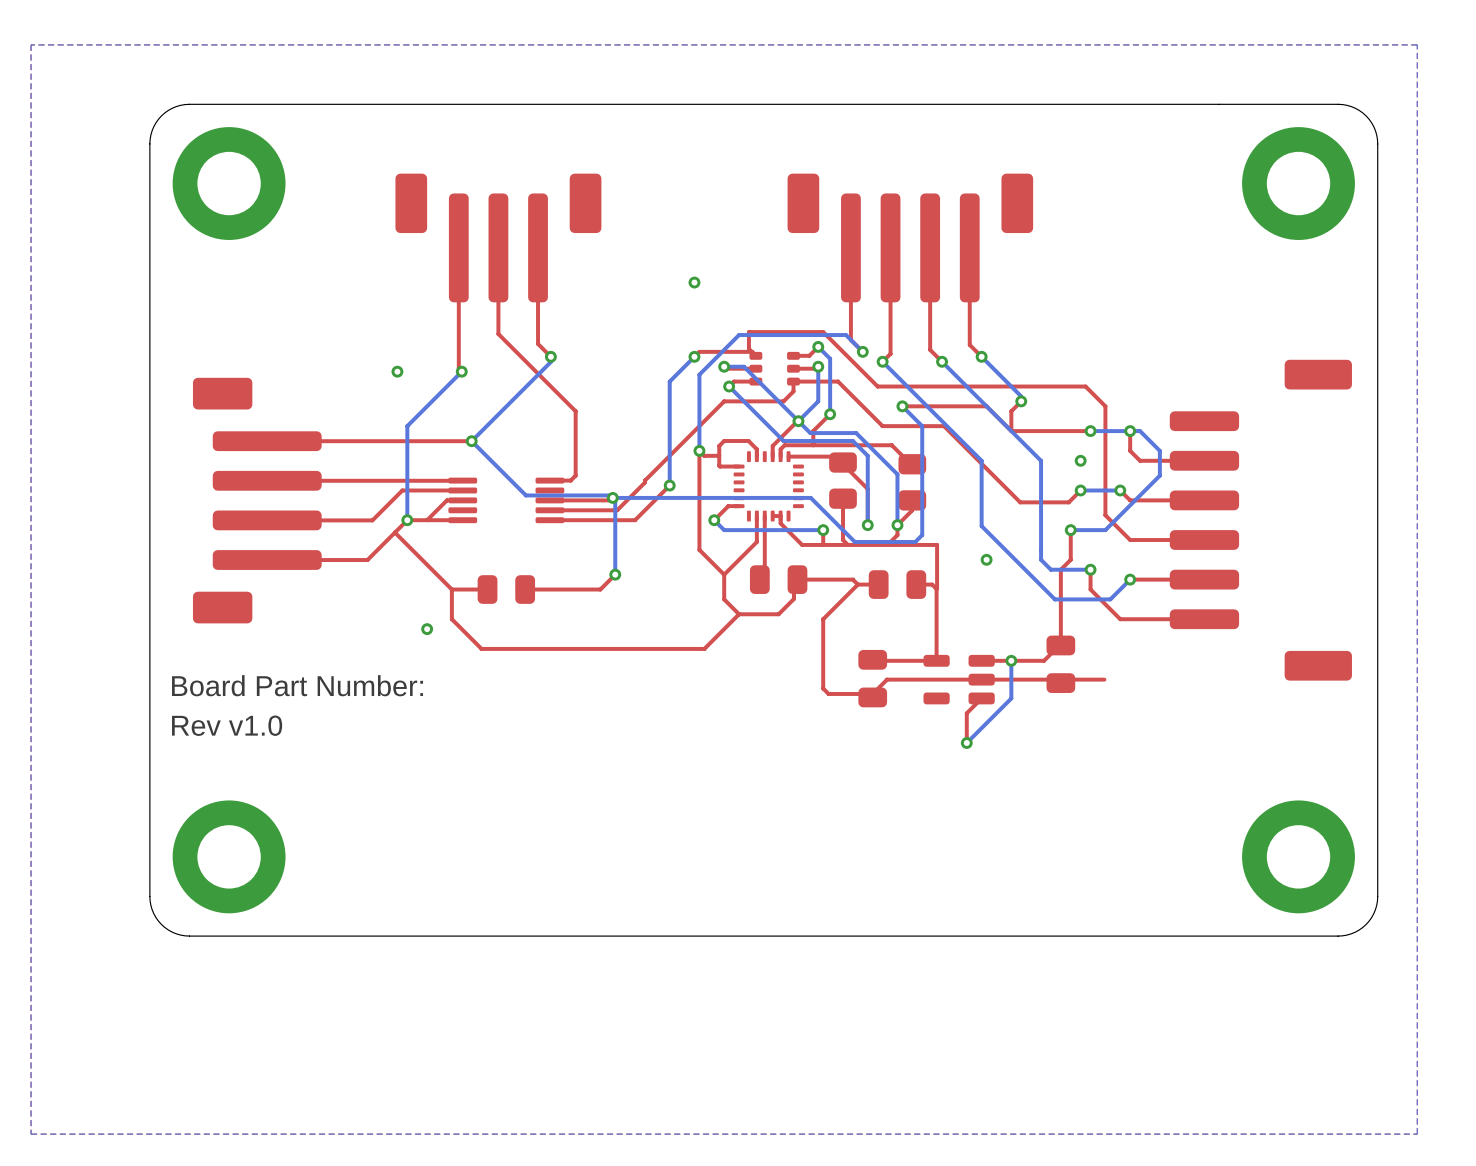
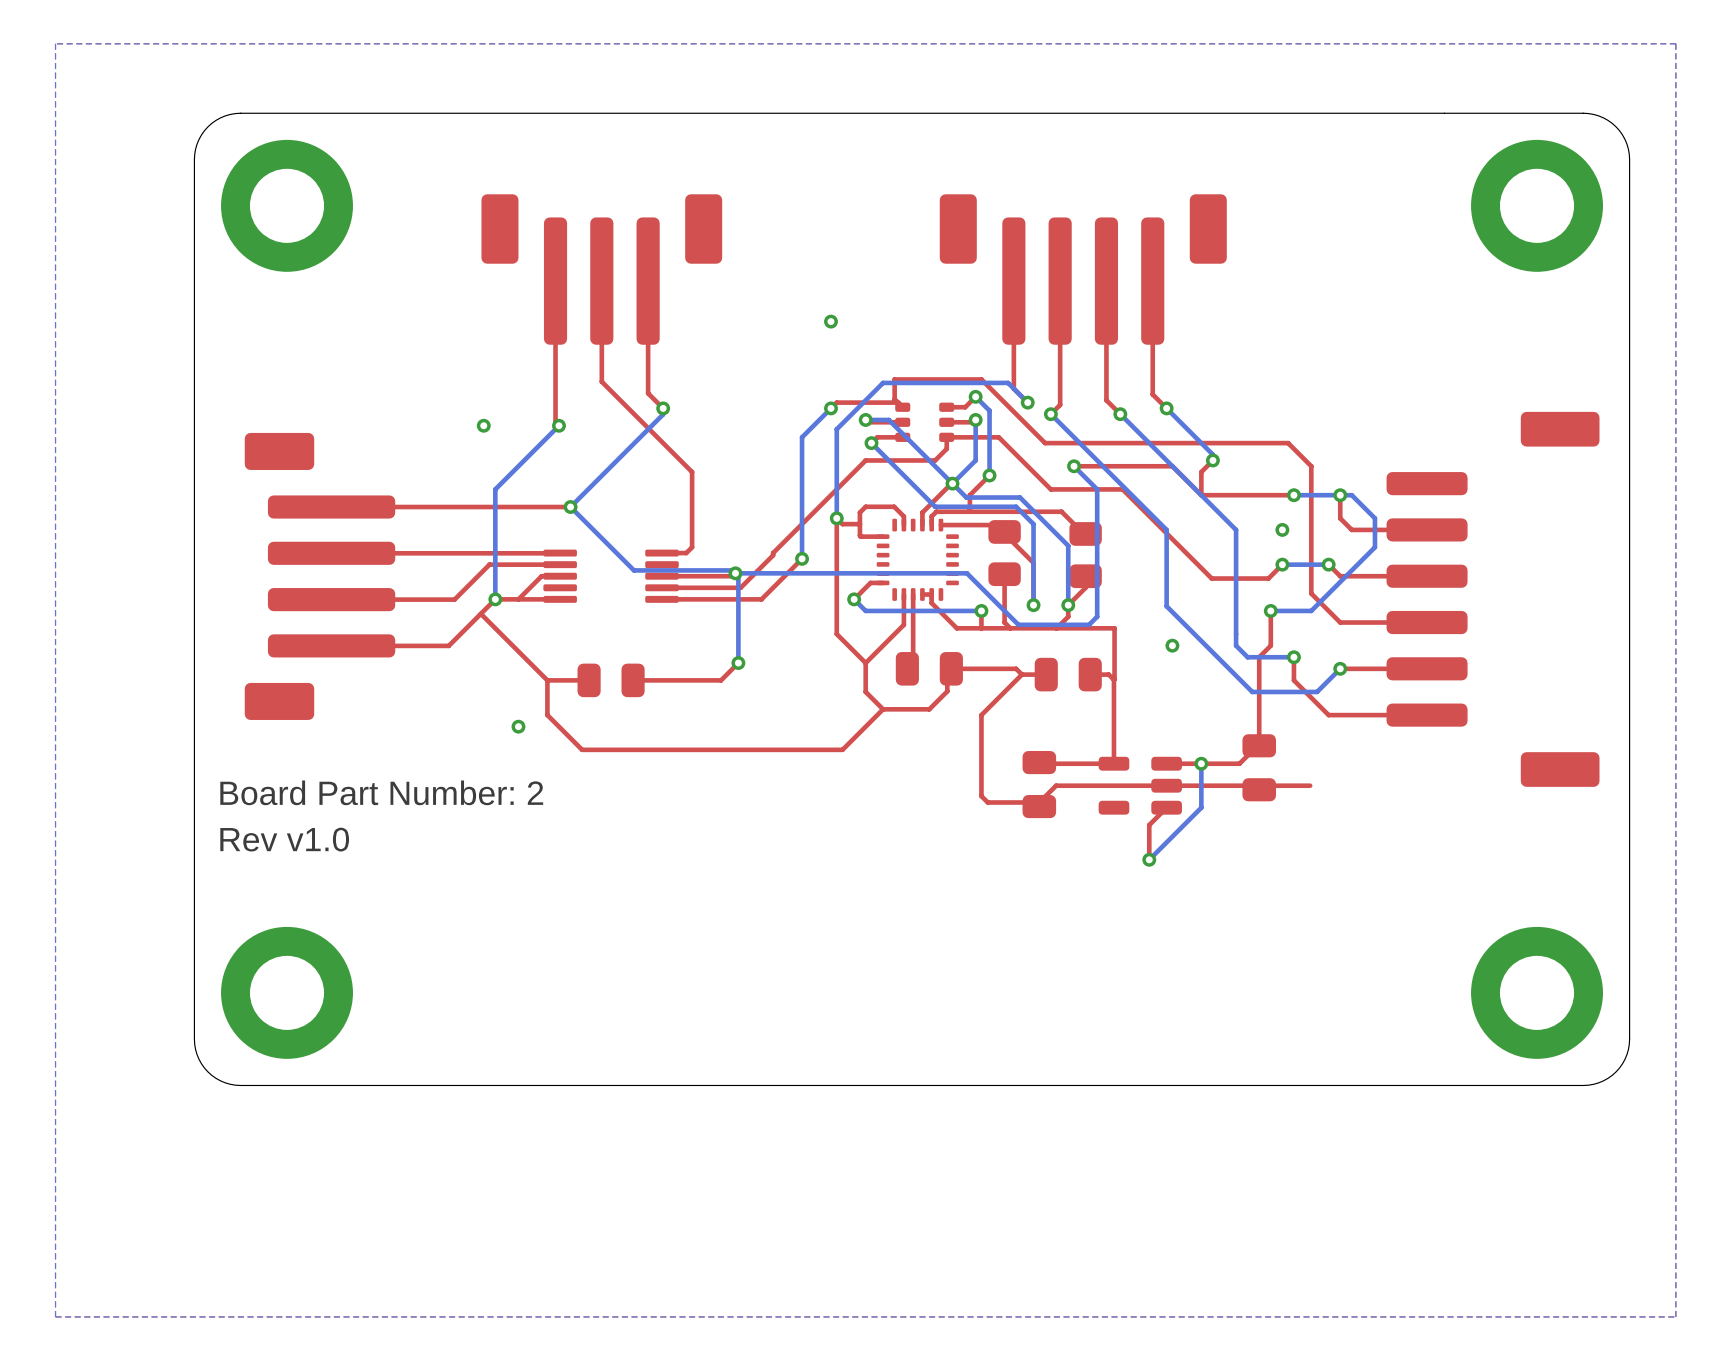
text: Board Part Number: (297, 685) -> Board Part Number: 2 (381, 792)

